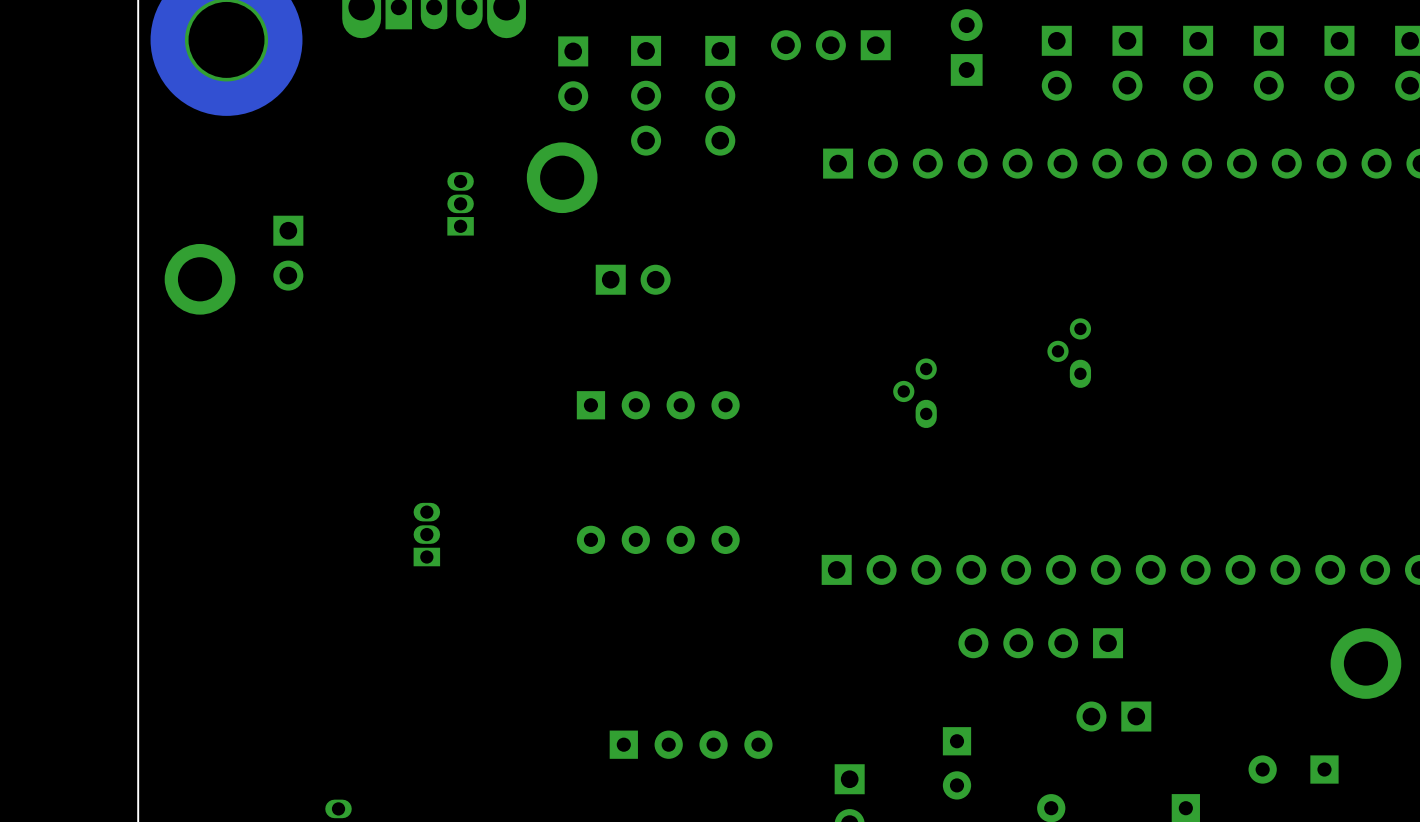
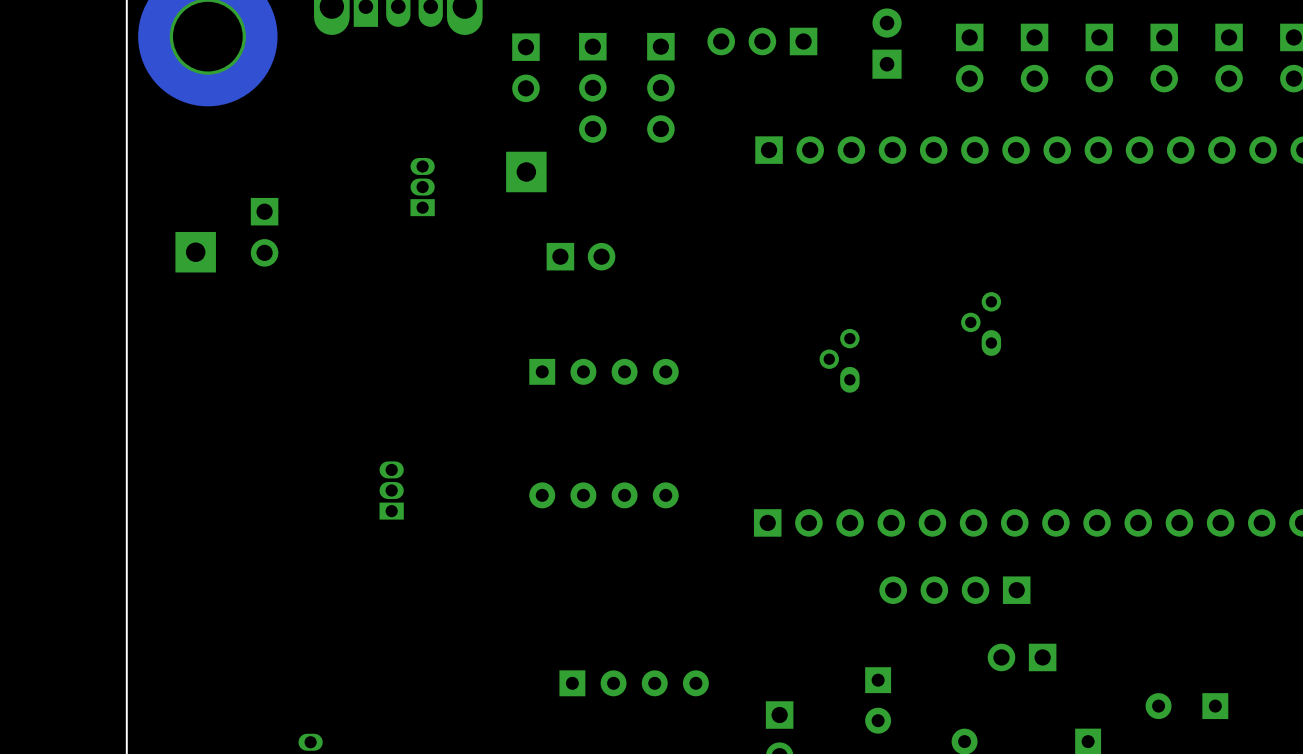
part footprint: [526, 142, 598, 214] -> [506, 151, 547, 193]
part footprint: [164, 243, 236, 315] -> [175, 231, 216, 273]
part: (1365, 663) -> none

